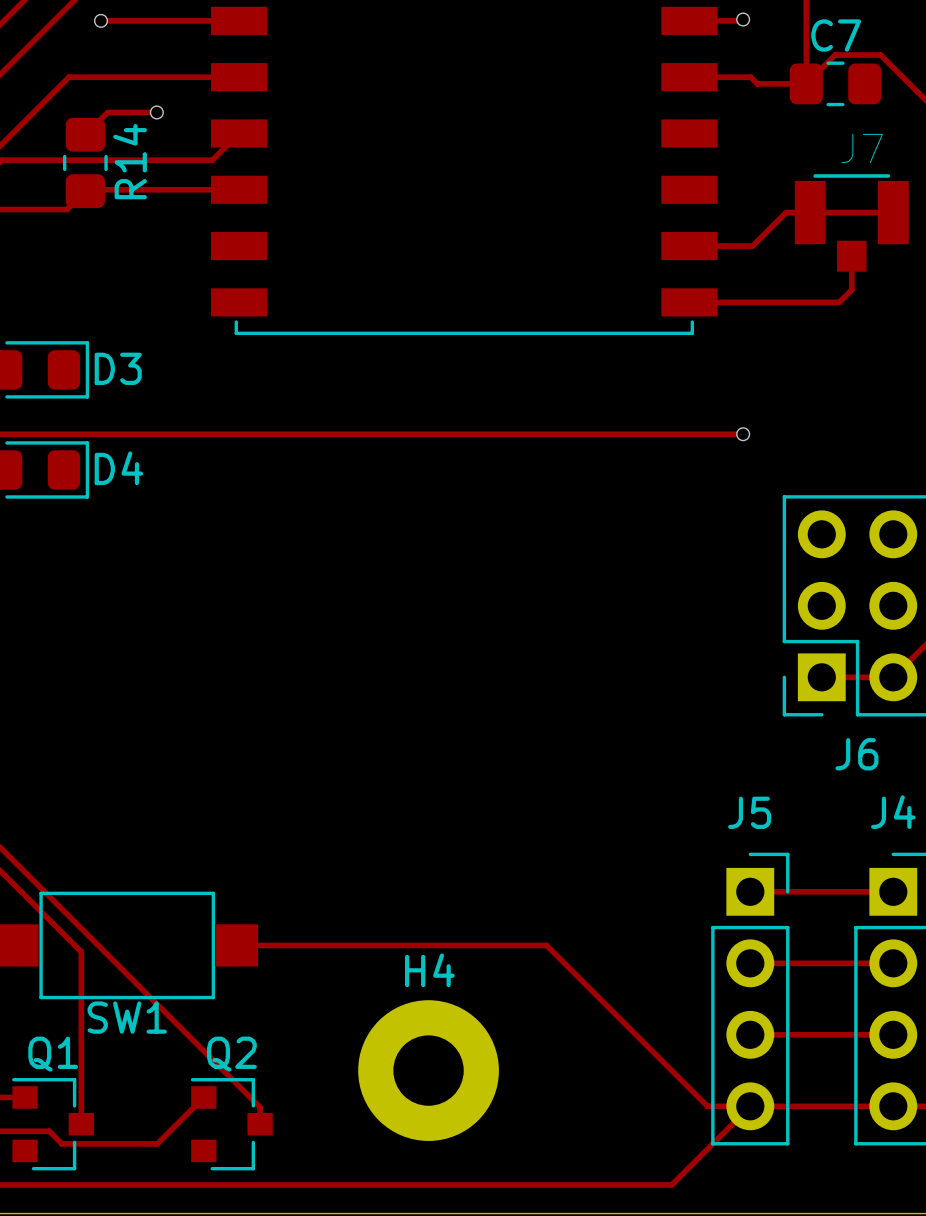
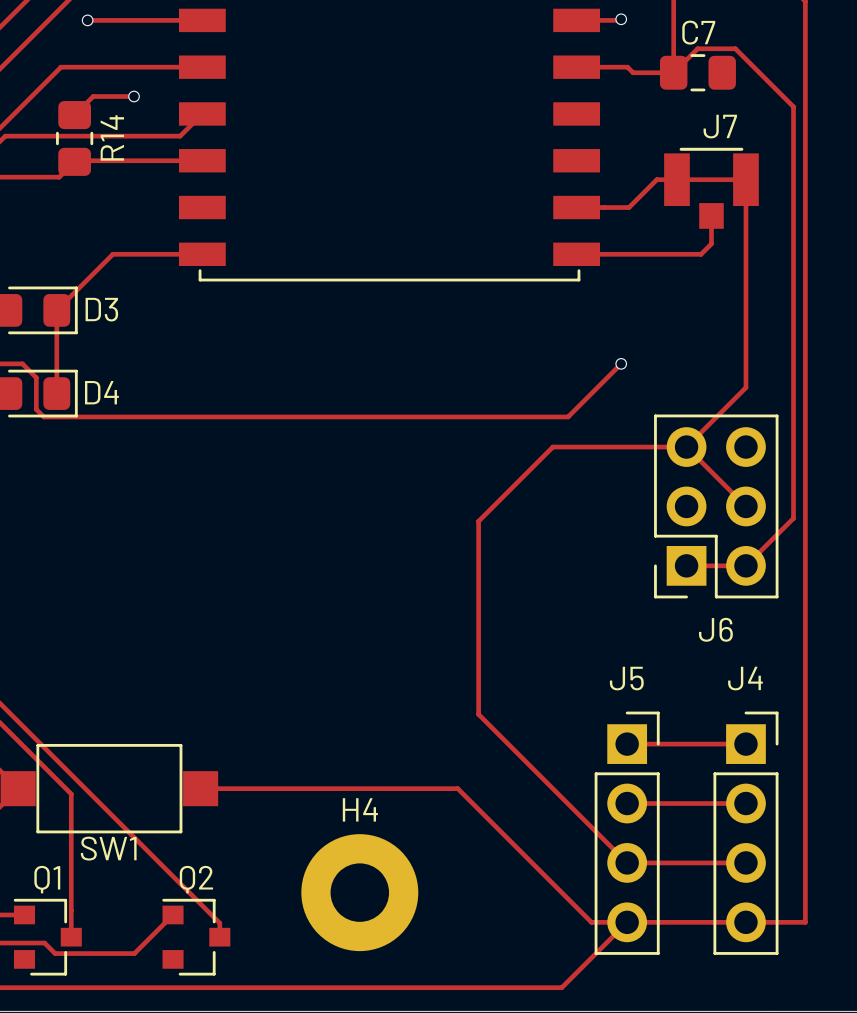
track: none -> (745, 179) (745, 387) (686, 447)
track: none -> (202, 254) (112, 254) (56, 310) (56, 393)
track: (22, 434) (743, 434) -> (22, 363) (36, 377) (36, 409) (43, 416) (568, 416) (621, 363)
track: none -> (686, 447) (745, 506)
track: none -> (686, 447) (552, 447) (478, 521) (478, 714) (627, 862)

